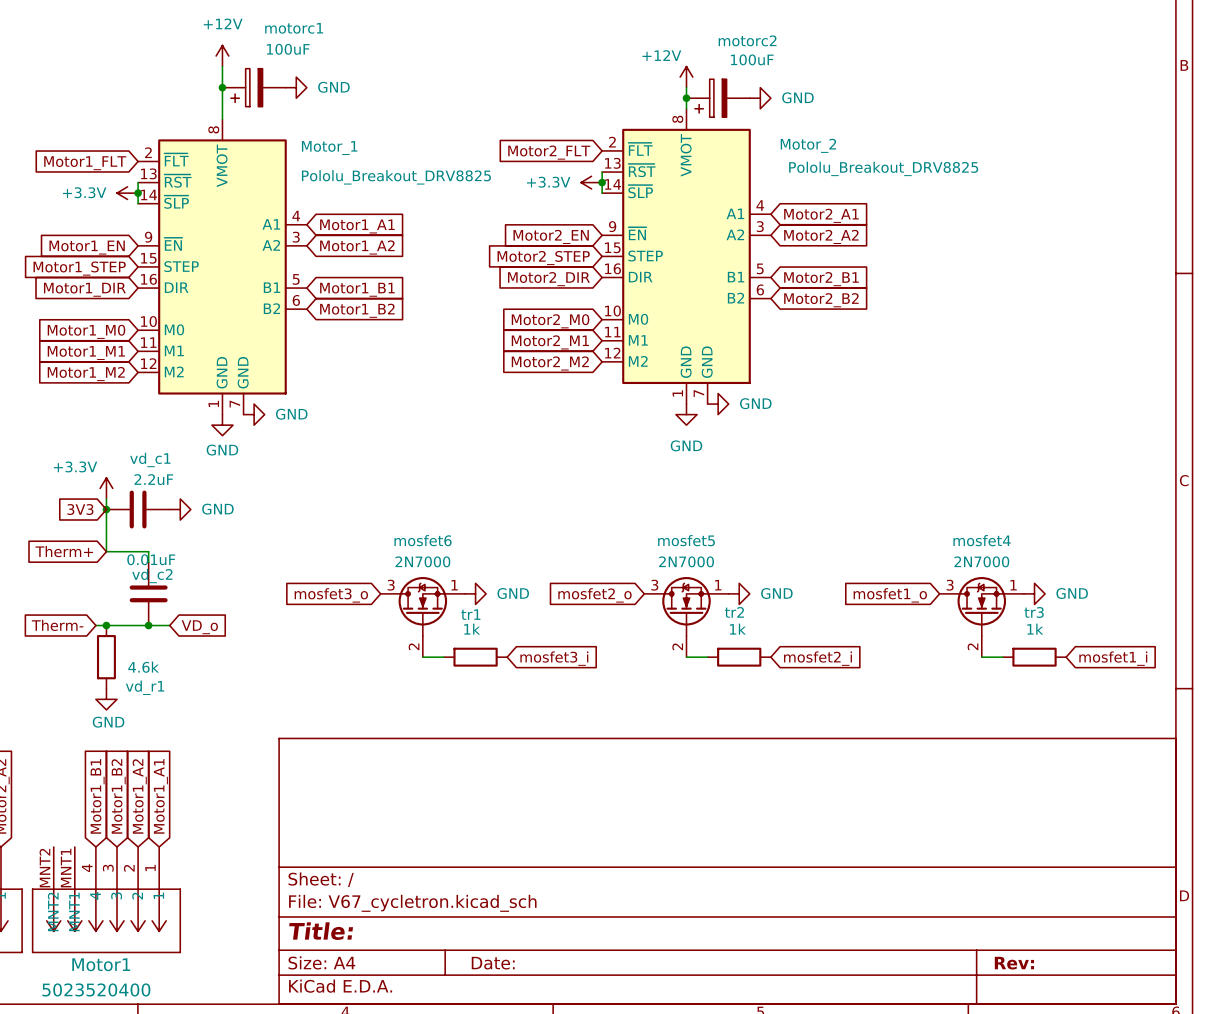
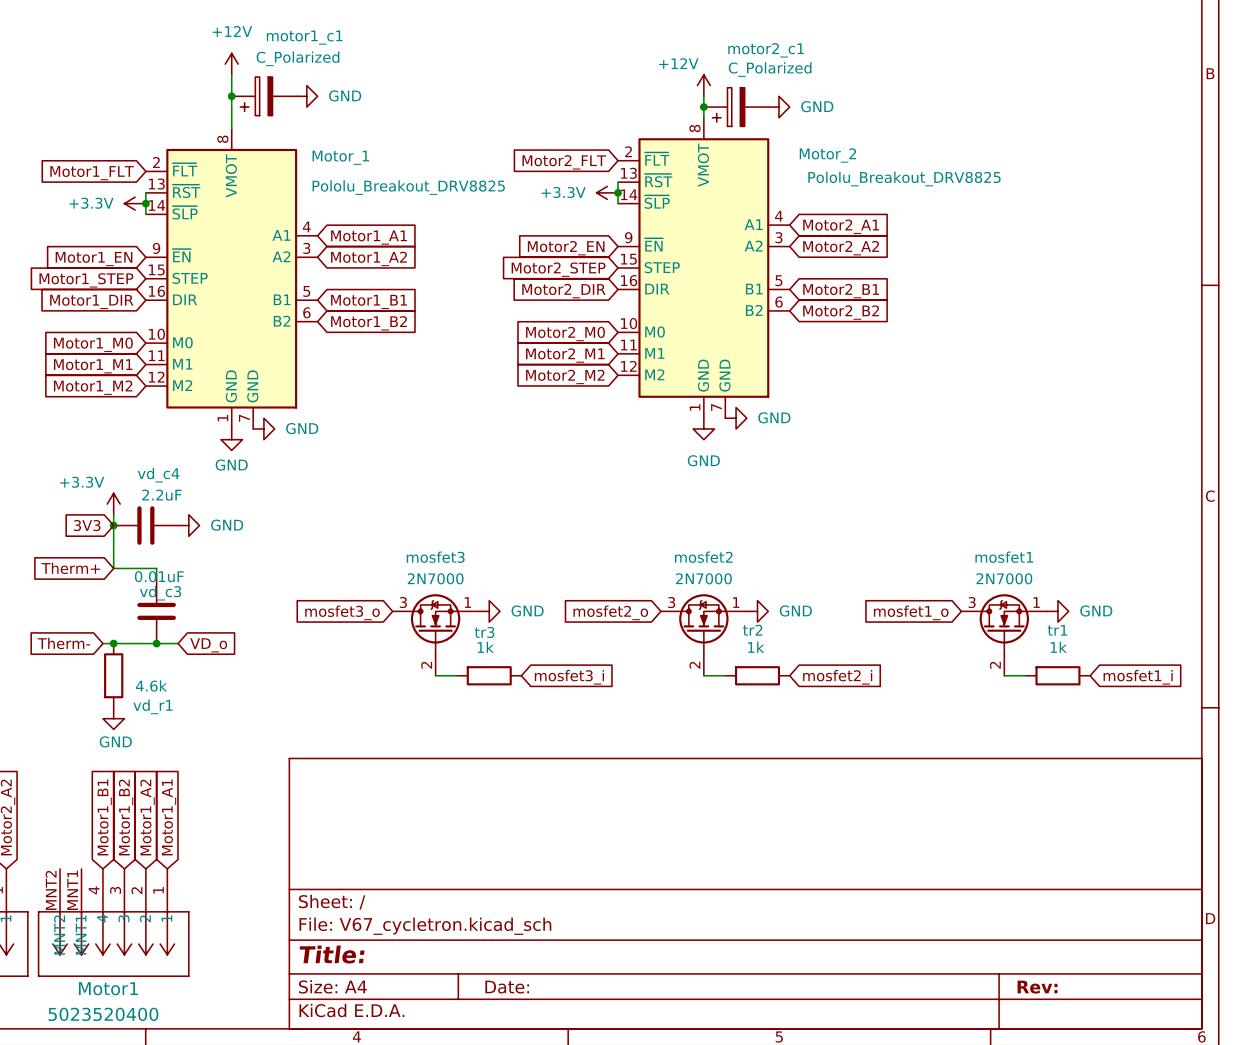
motorc1 name: motorc1 (294, 28) -> motor1_c1 (304, 37)
motorc2 name: motorc2 (747, 40) -> motor2_c1 (766, 50)
motorc1 value: 100uF (288, 49) -> C_Polarized (298, 58)
motorc2 value: 100uF (752, 59) -> C_Polarized (770, 69)
vd_c1 name: vd_c1 (150, 459) -> vd_c4 (158, 475)
mosfet6 name: mosfet6 (423, 540) -> mosfet3 (435, 557)
mosfet5 name: mosfet5 (686, 540) -> mosfet2 (703, 557)
mosfet4 name: mosfet4 (982, 540) -> mosfet1 (1004, 557)
vd_c2 name: vd_c2 (152, 575) -> vd_c3 (160, 593)
tr3 name: tr3 (1034, 612) -> tr1 (1057, 630)
tr1 name: tr1 (470, 614) -> tr3 (484, 632)

